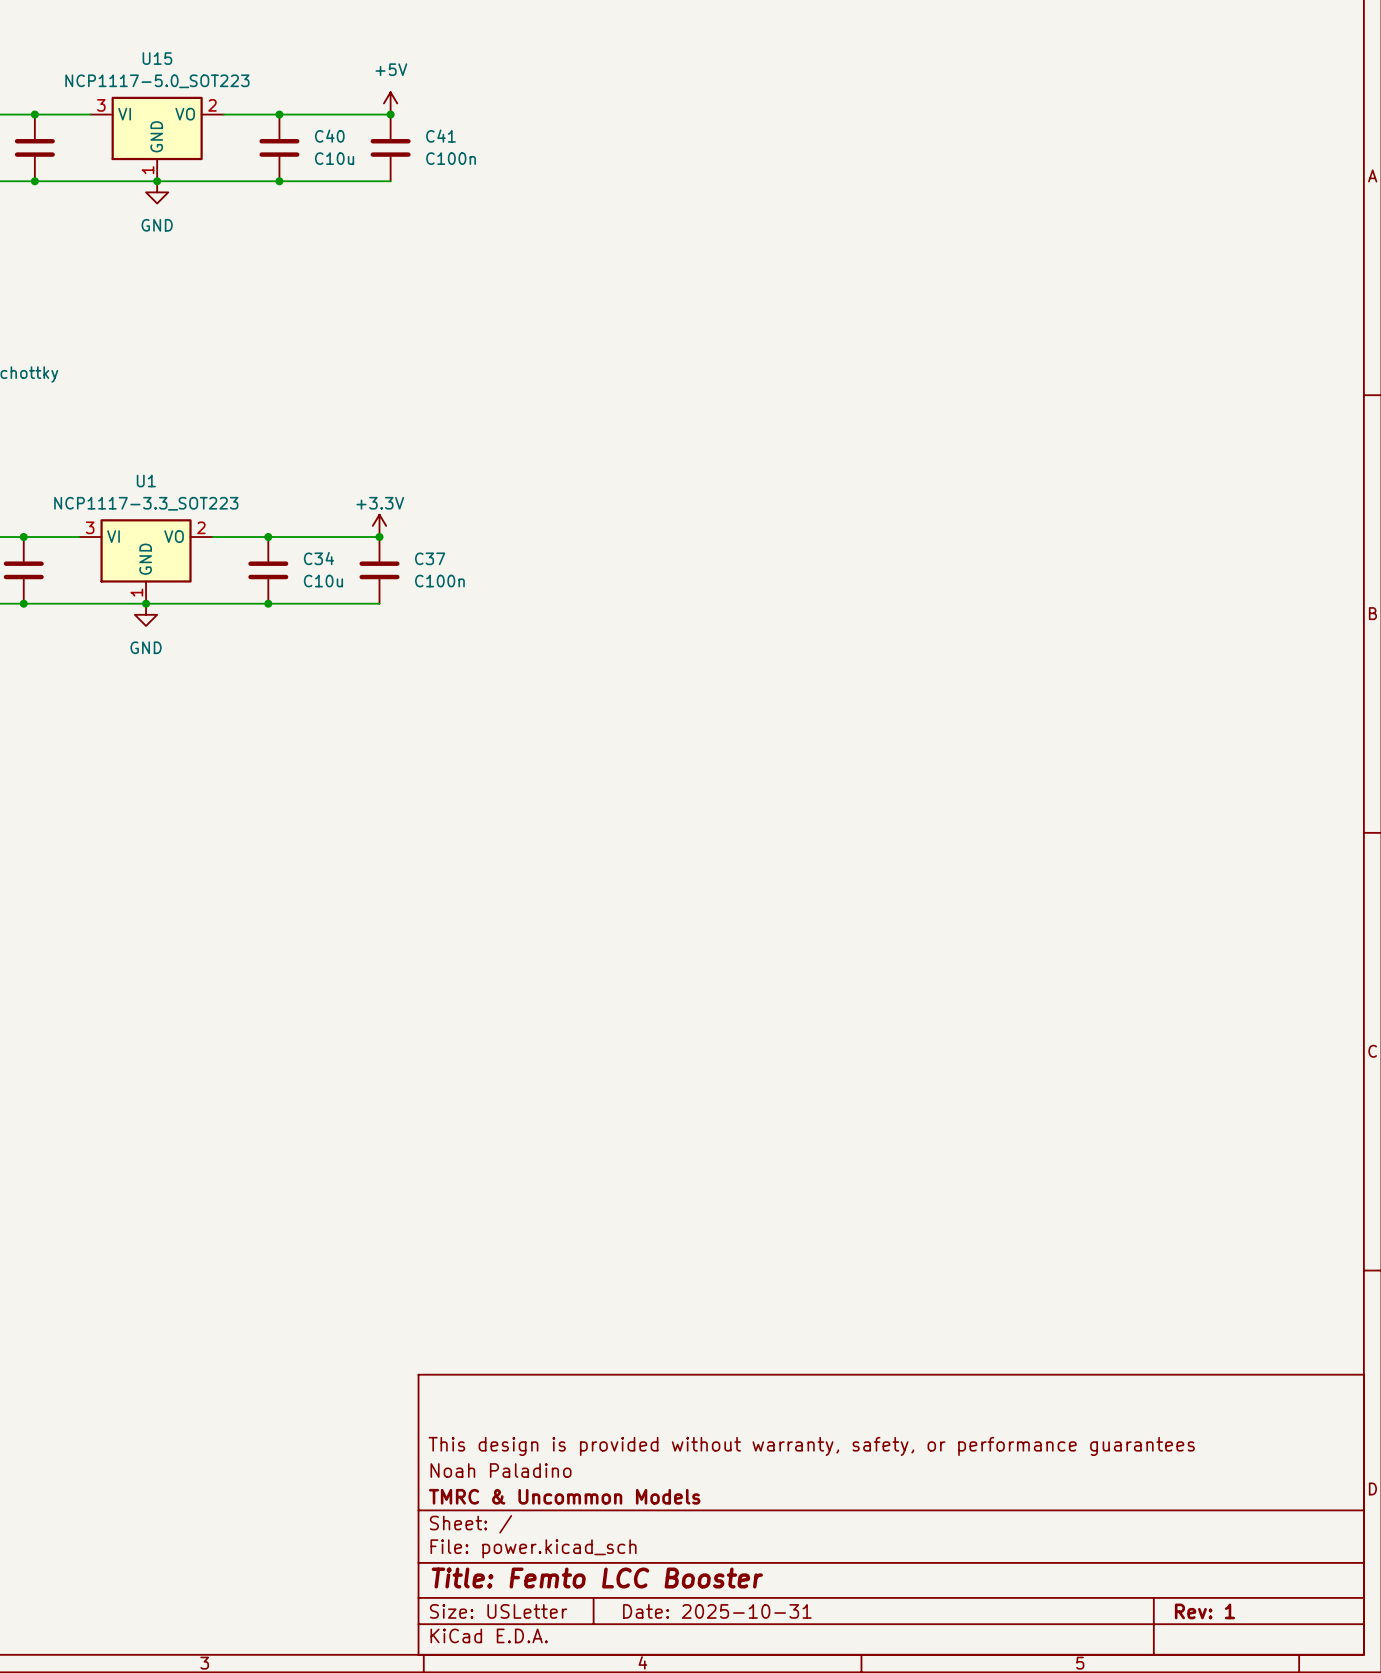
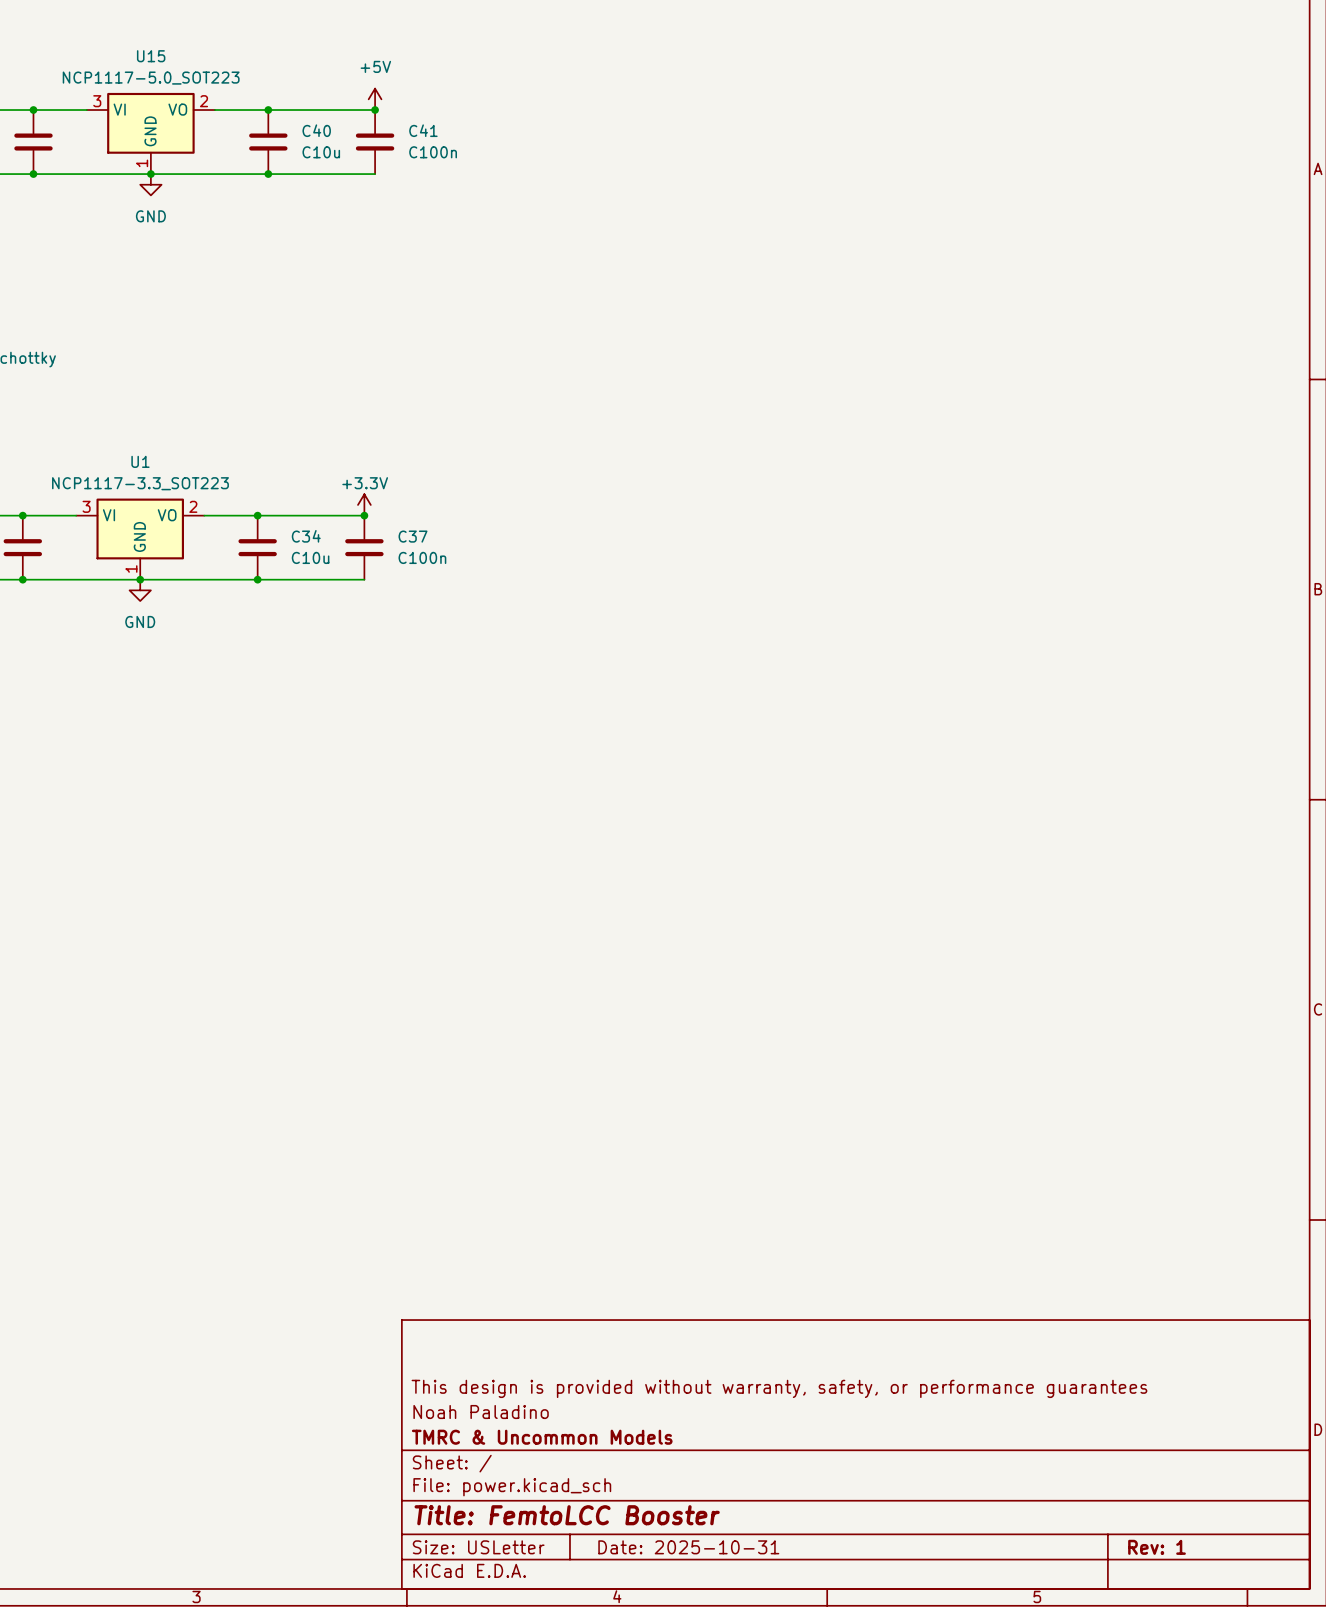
title block: Title: Femto LCC Booster (597, 1578) -> Title: FemtoLCC Booster (567, 1515)

